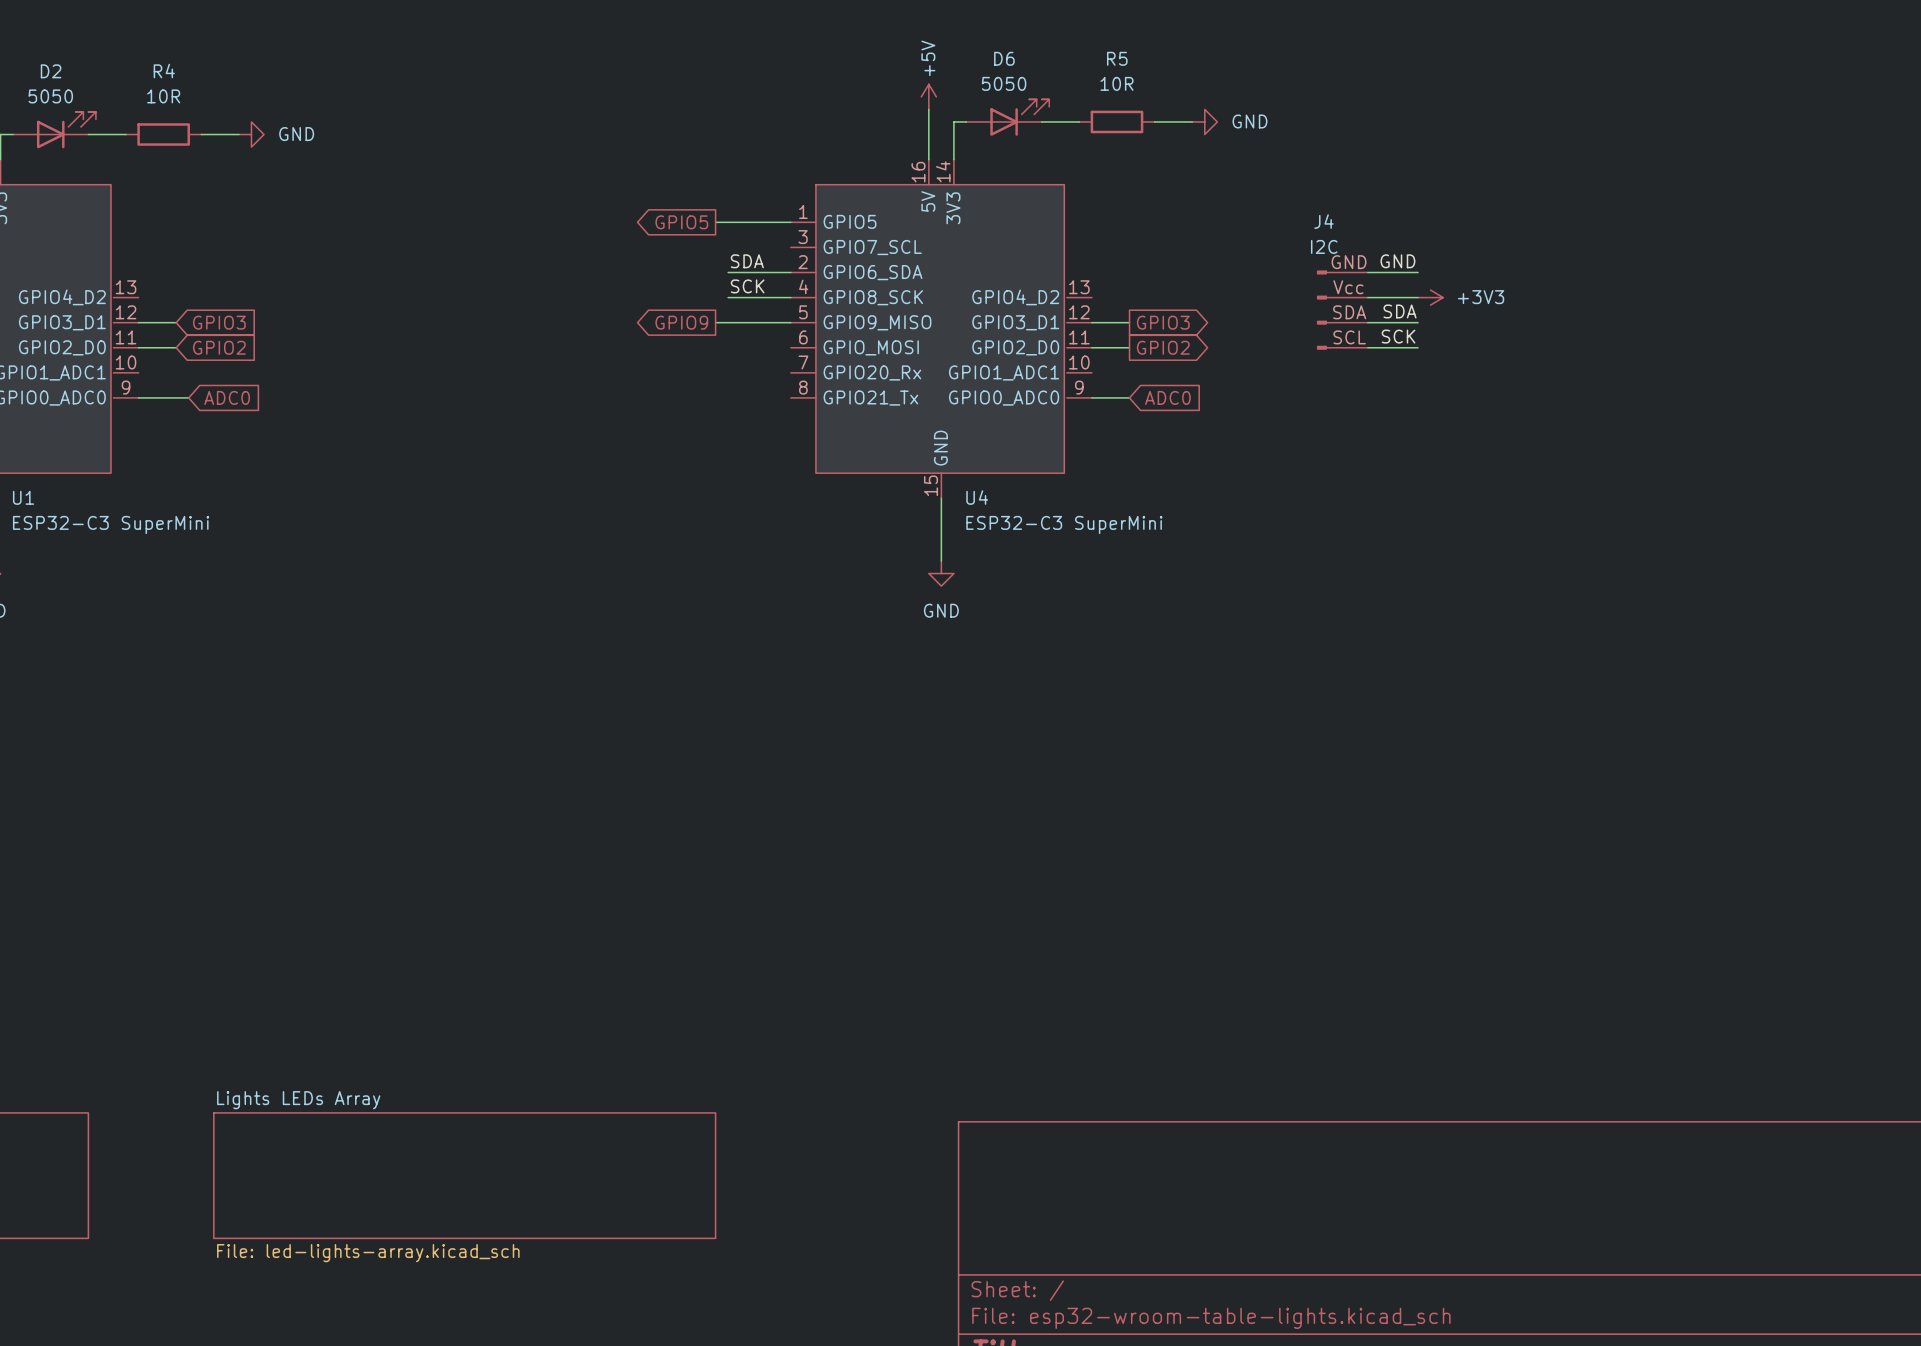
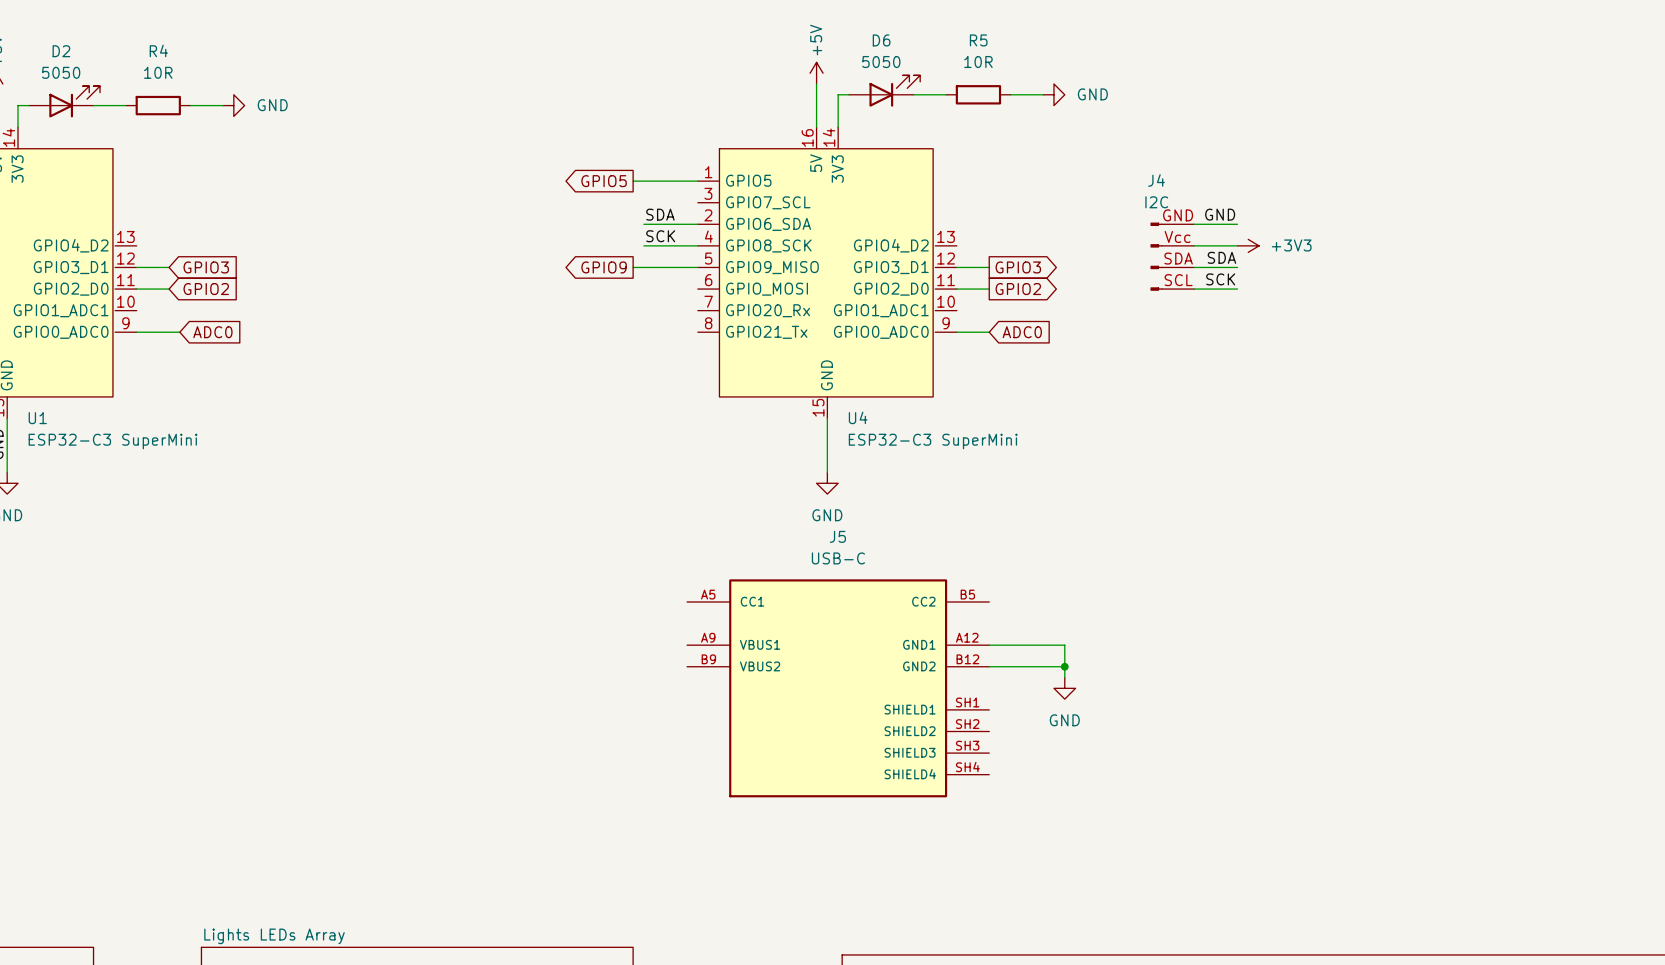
wire: none -> (989, 645) (1064, 645) (1064, 677)
wire: none -> (989, 666) (1064, 666)
junction: none -> (1064, 666)
J5: none -> USB-C (838, 688)
power symbol: none -> GND (1064, 688)

